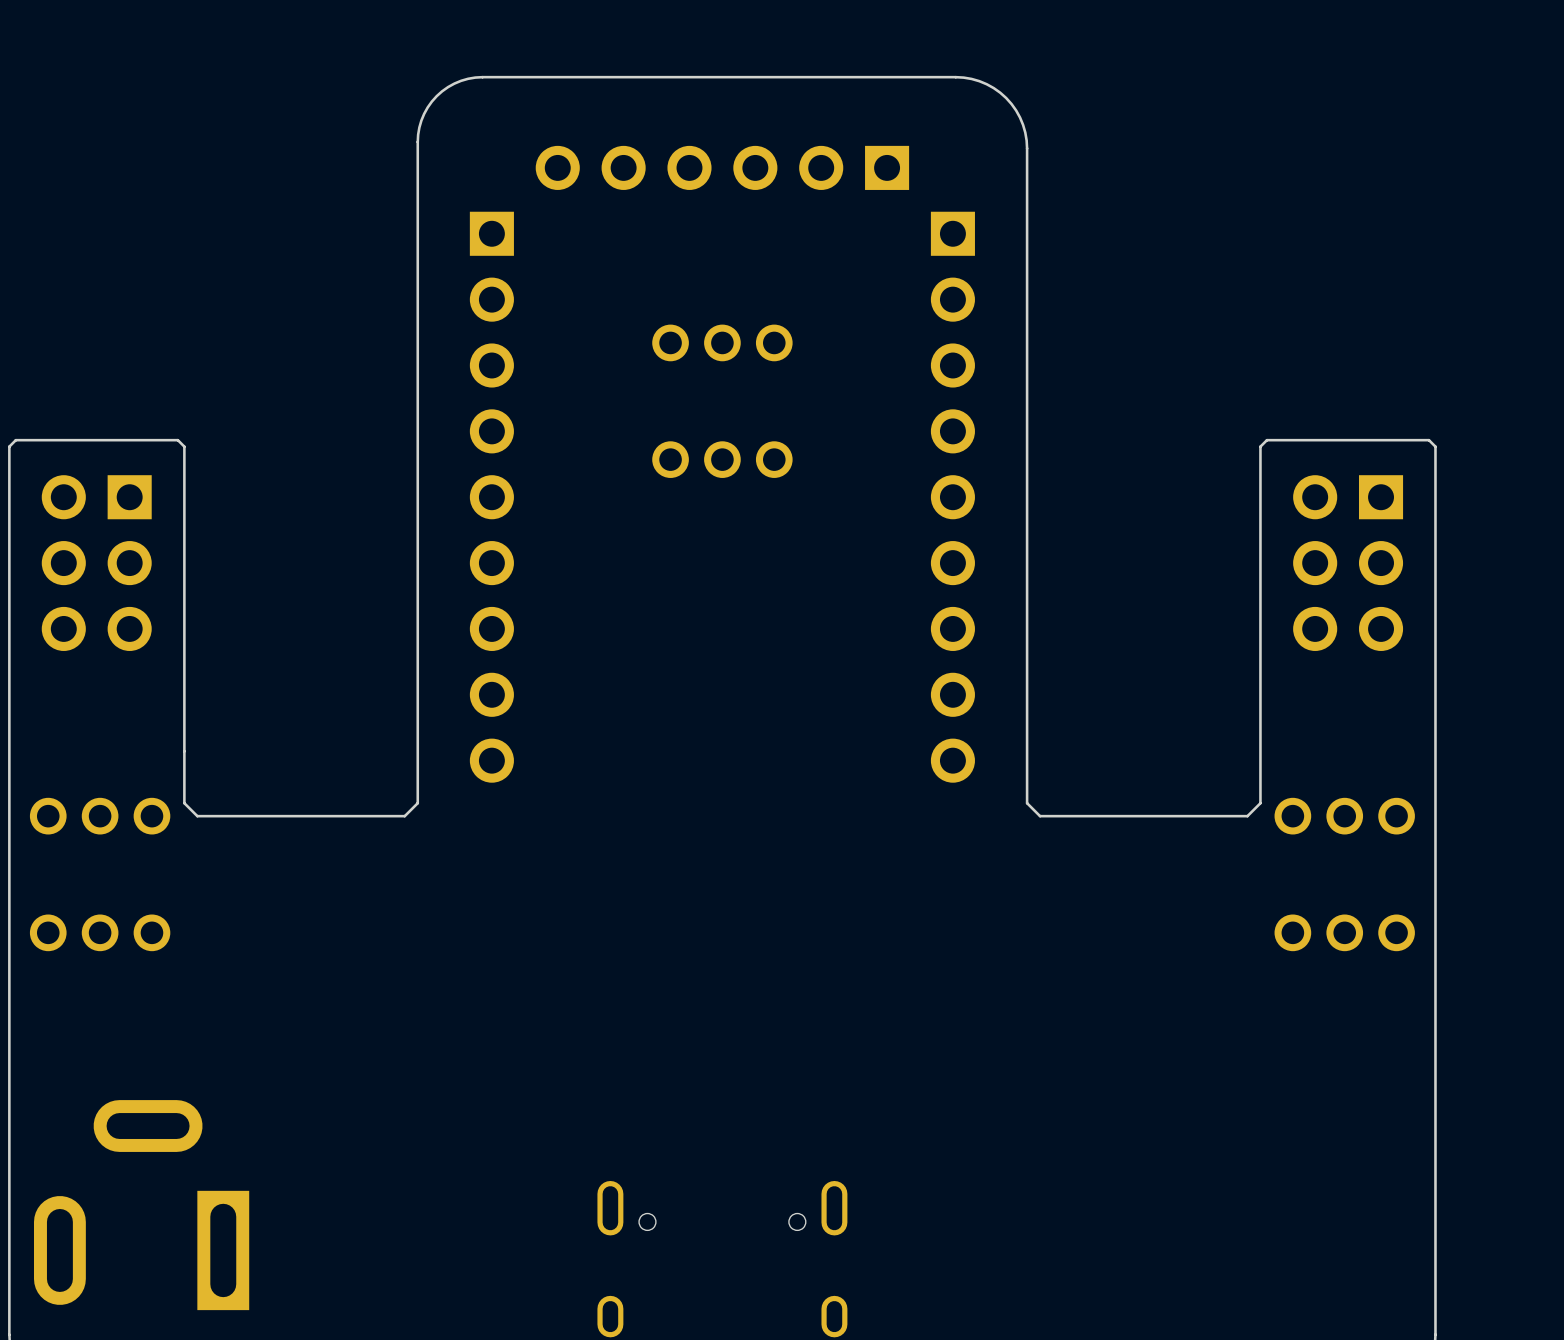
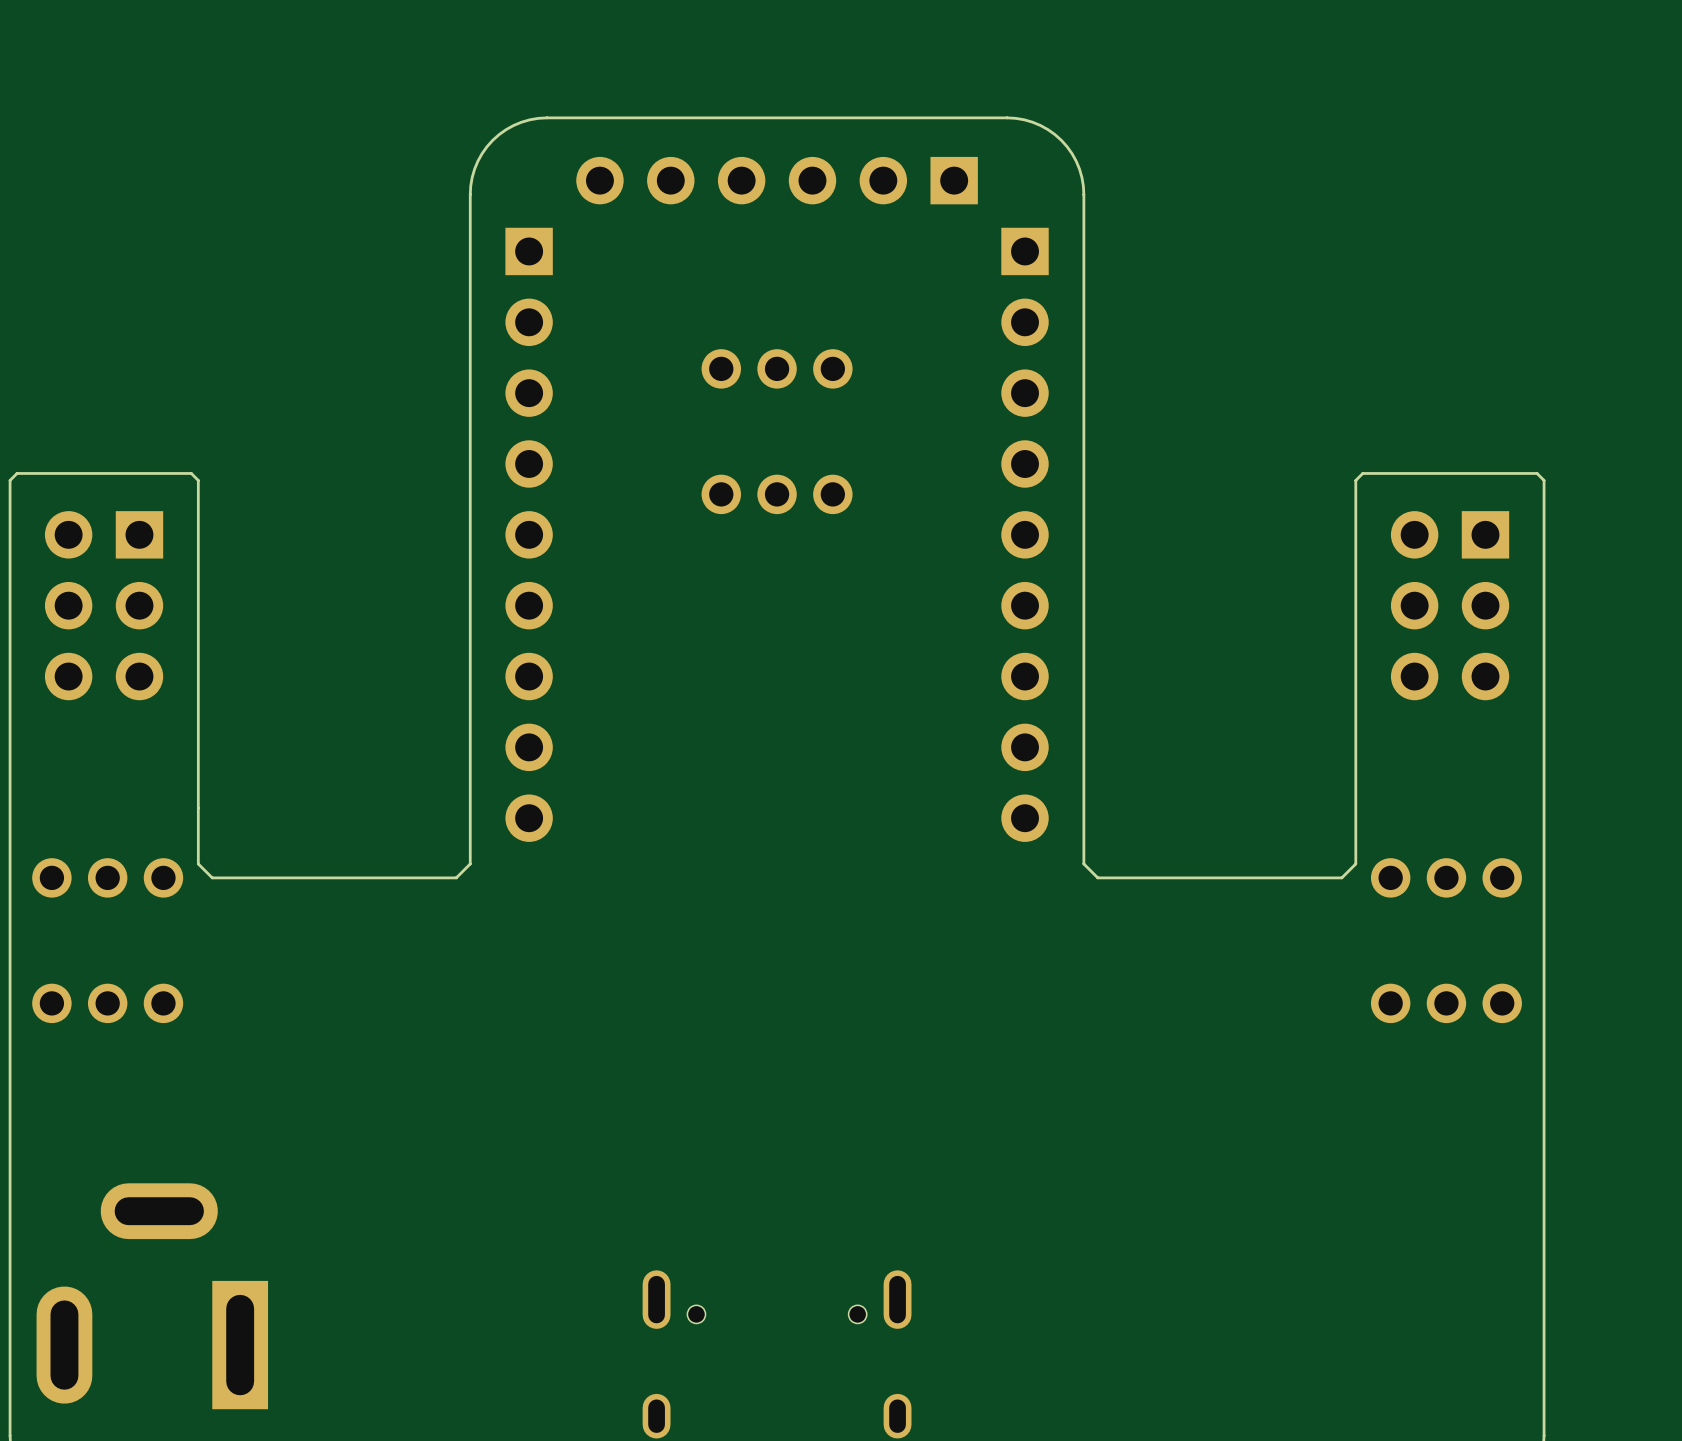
board edge: (1040, 816) (1027, 803) (1026, 140) (1020, 117) (1011, 104) (1000, 92) (979, 81) (955, 77) (482, 77) (468, 78) (454, 83) (442, 91) (431, 101) (421, 120) (417, 141) (417, 803) (404, 816) -> (1118, 877) (1097, 877) (1083, 863) (1083, 185) (1079, 169) (1072, 153) (1054, 134) (1032, 122) (1007, 117) (546, 117) (529, 119) (513, 125) (499, 134) (487, 146) (474, 169) (470, 194) (470, 863) (456, 877) (435, 877)

